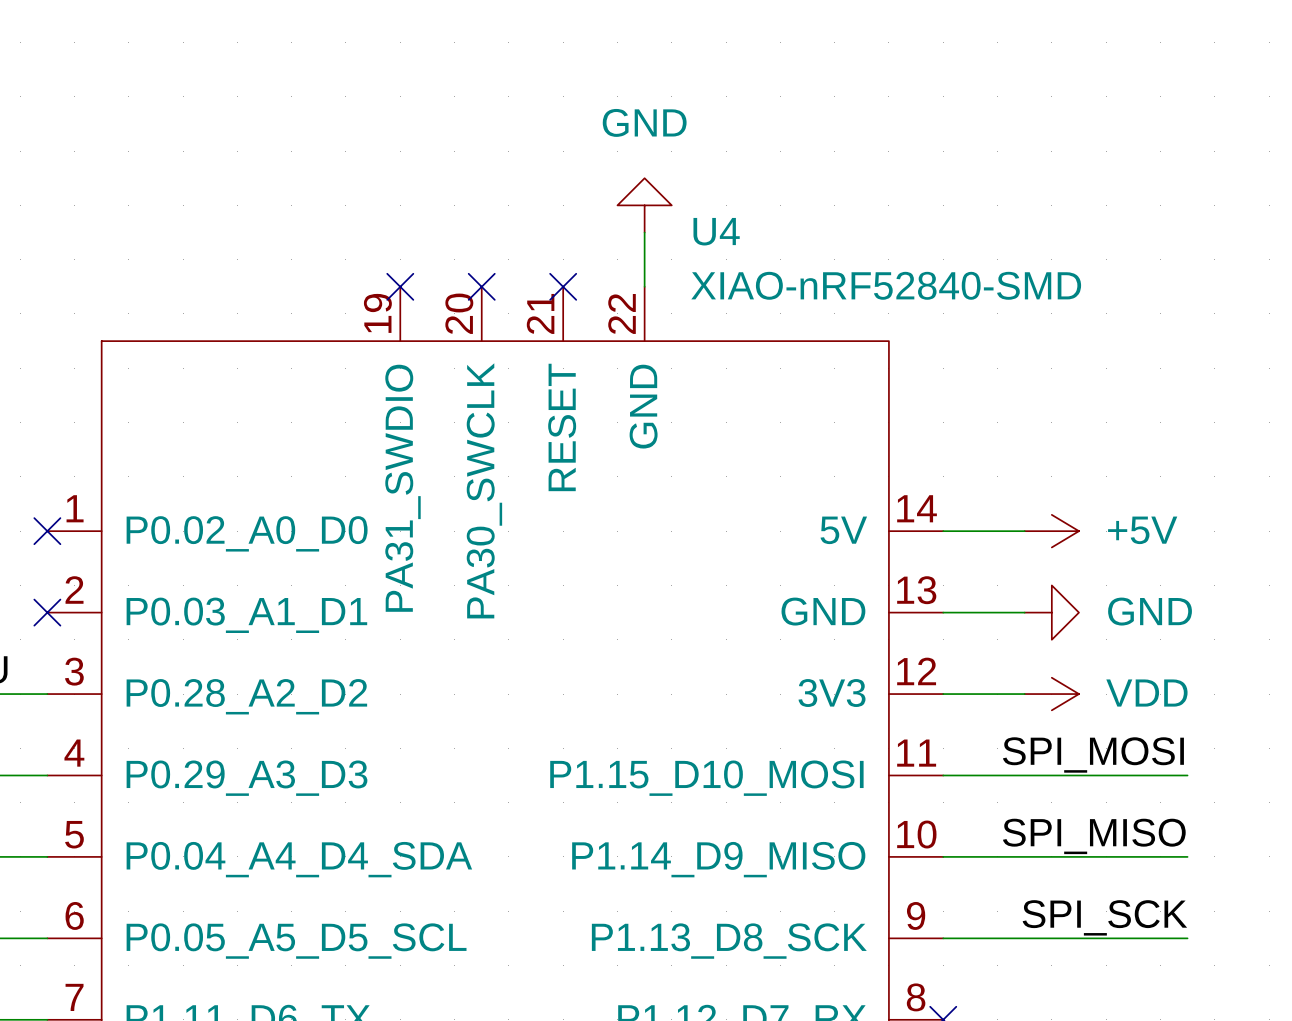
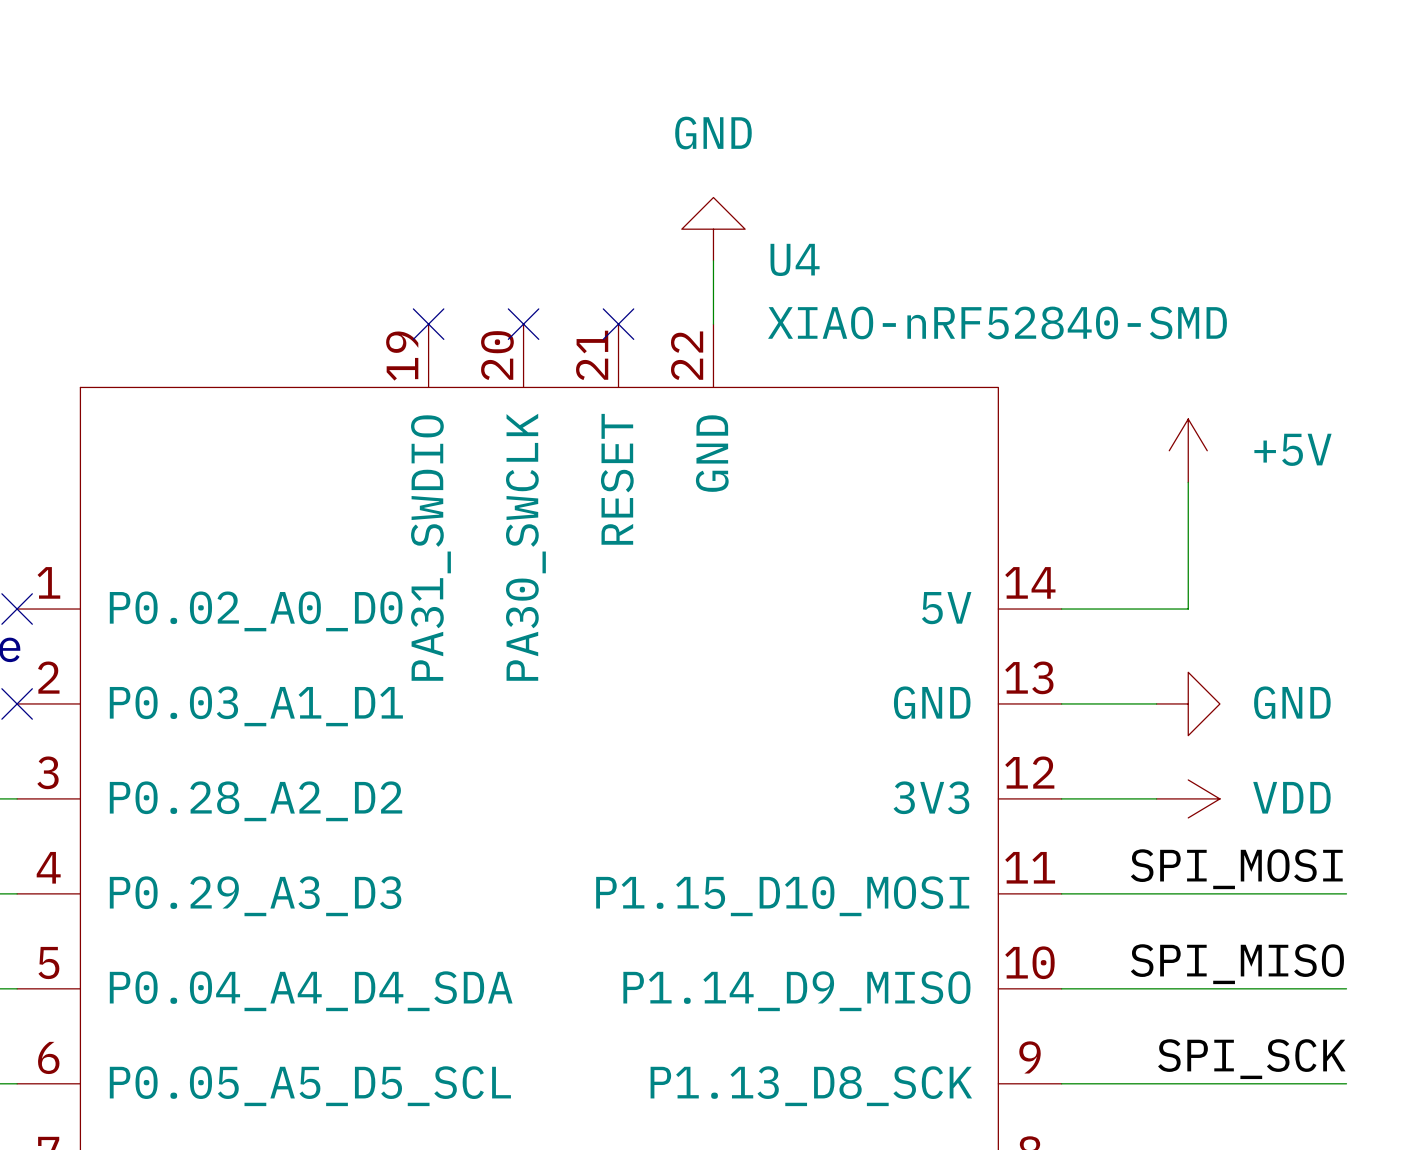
wire: none -> (1188, 482) (1188, 609) (1156, 609)
power symbol rotation: 0° (1051, 531) -> 90° counterclockwise (1188, 450)
power symbol position: +5V (1051, 531) -> +5V (1188, 450)

